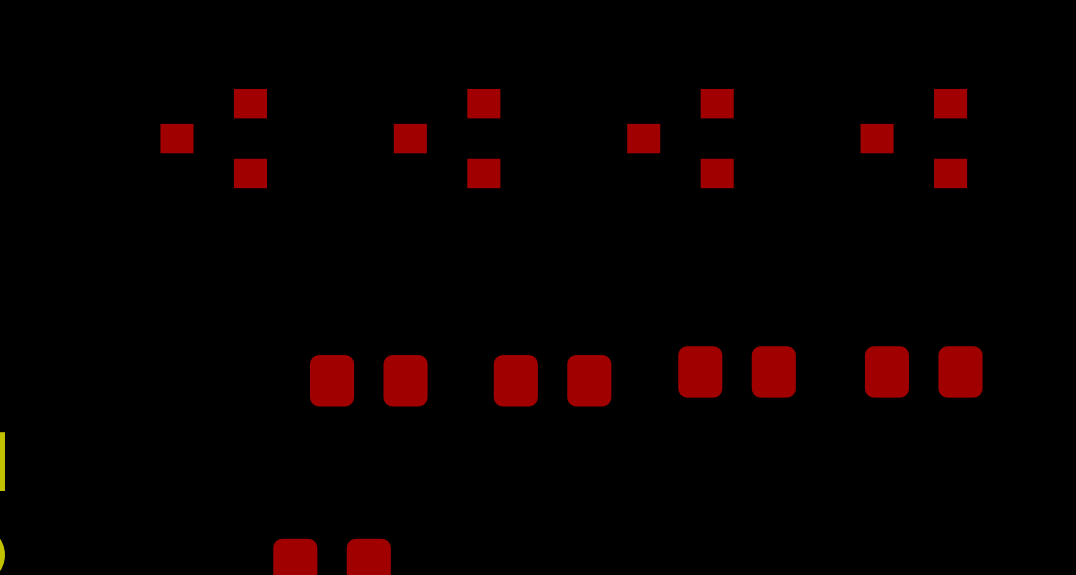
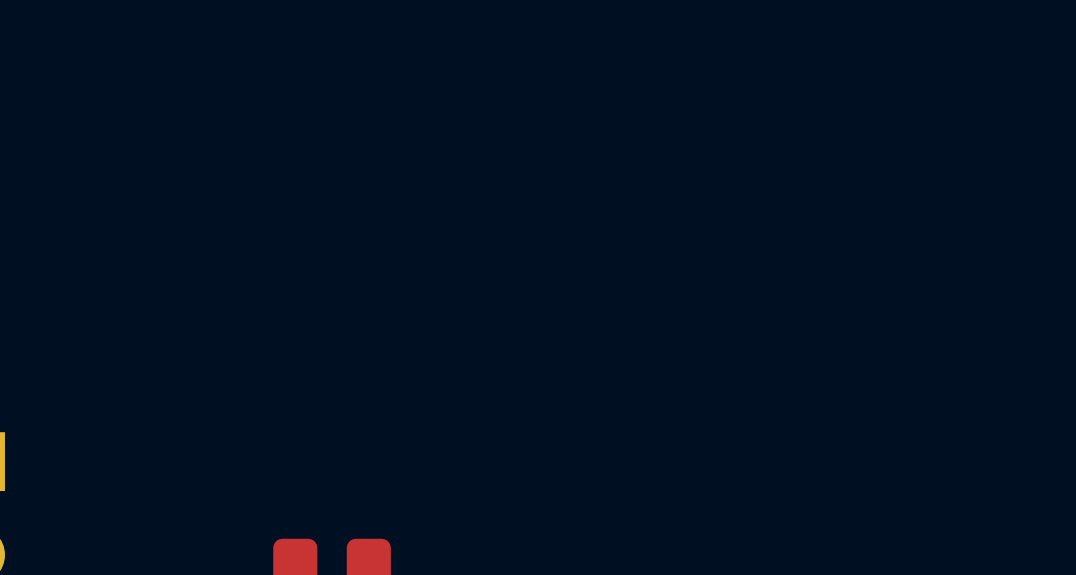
part: (213, 138) -> none
part: (447, 138) -> none
part: (680, 138) -> none
part: (913, 138) -> none
part: (737, 371) -> none
part: (923, 371) -> none
part: (368, 380) -> none
part: (552, 380) -> none

